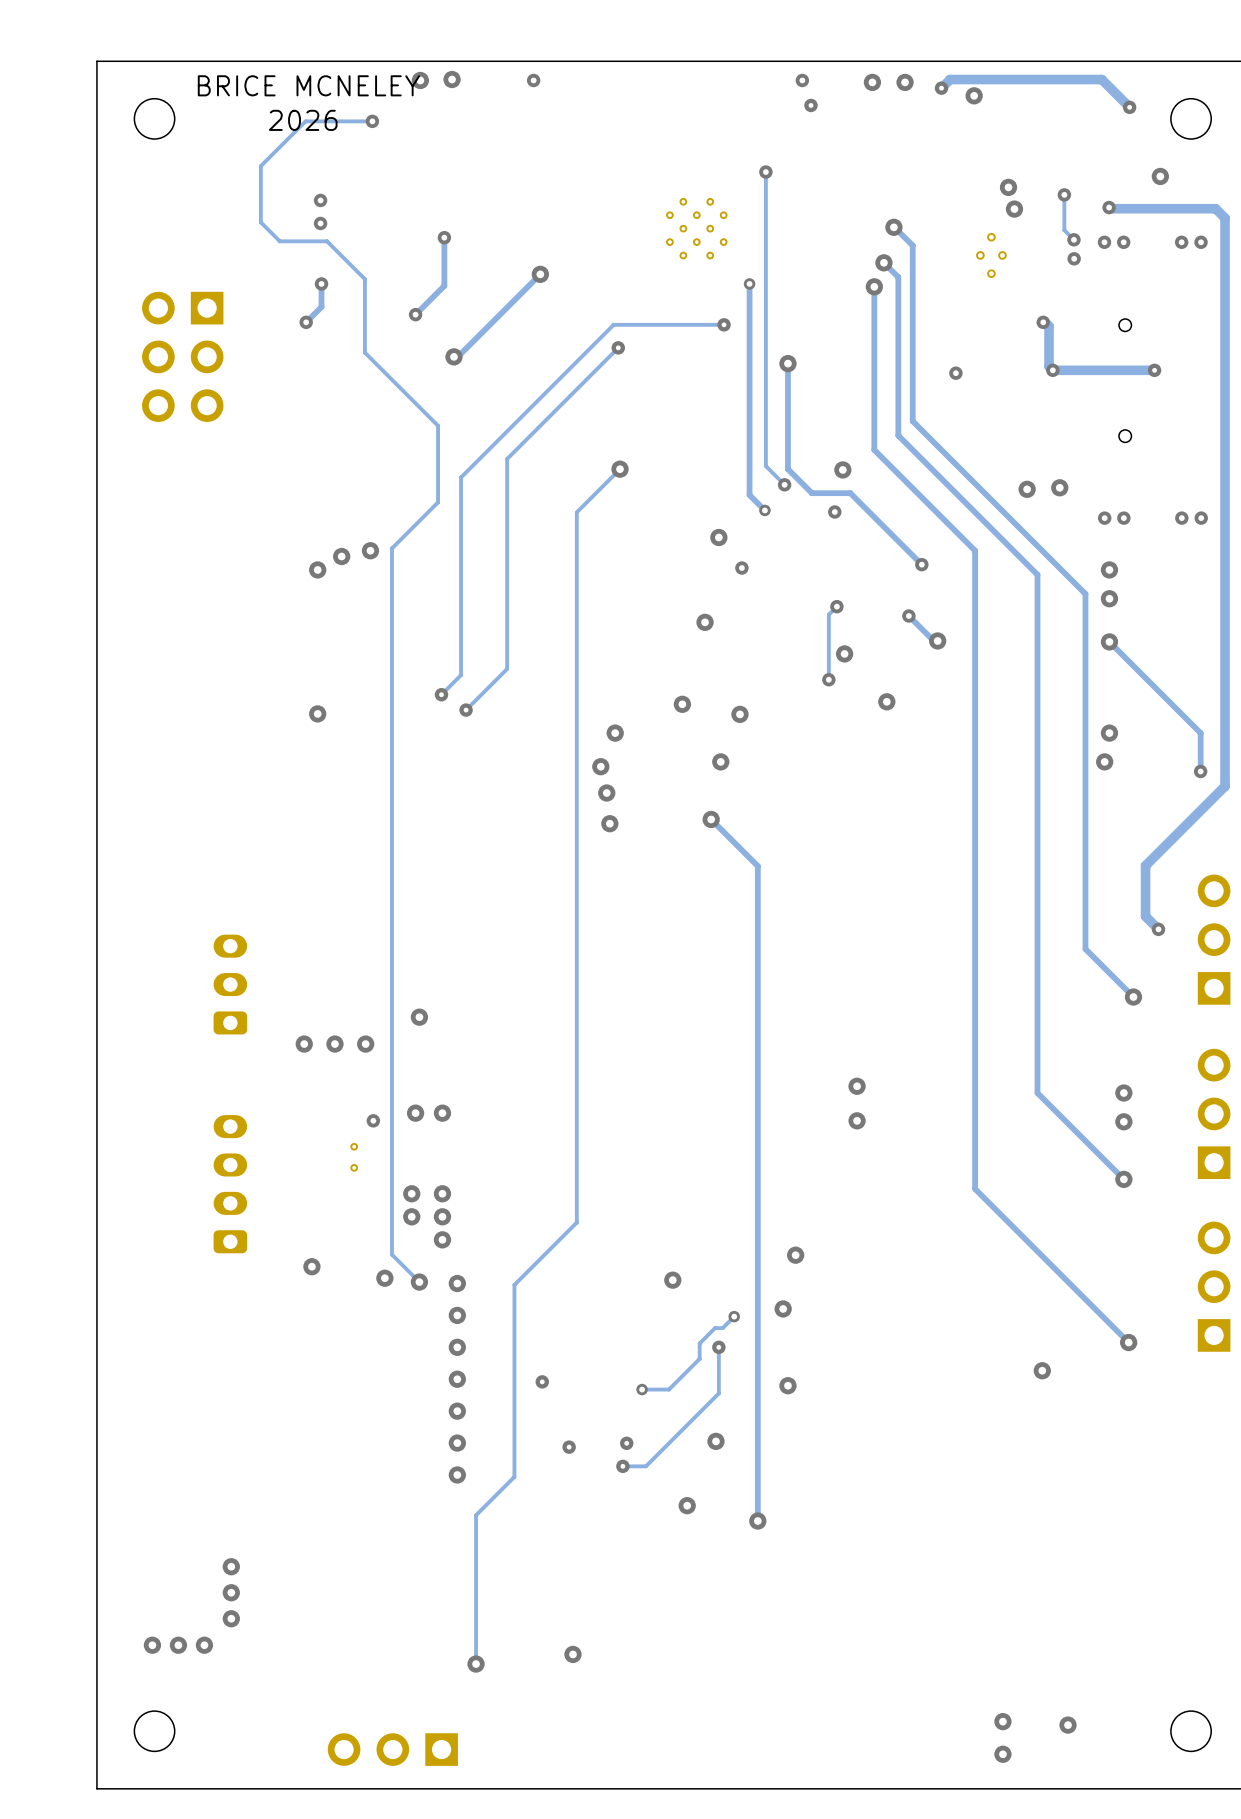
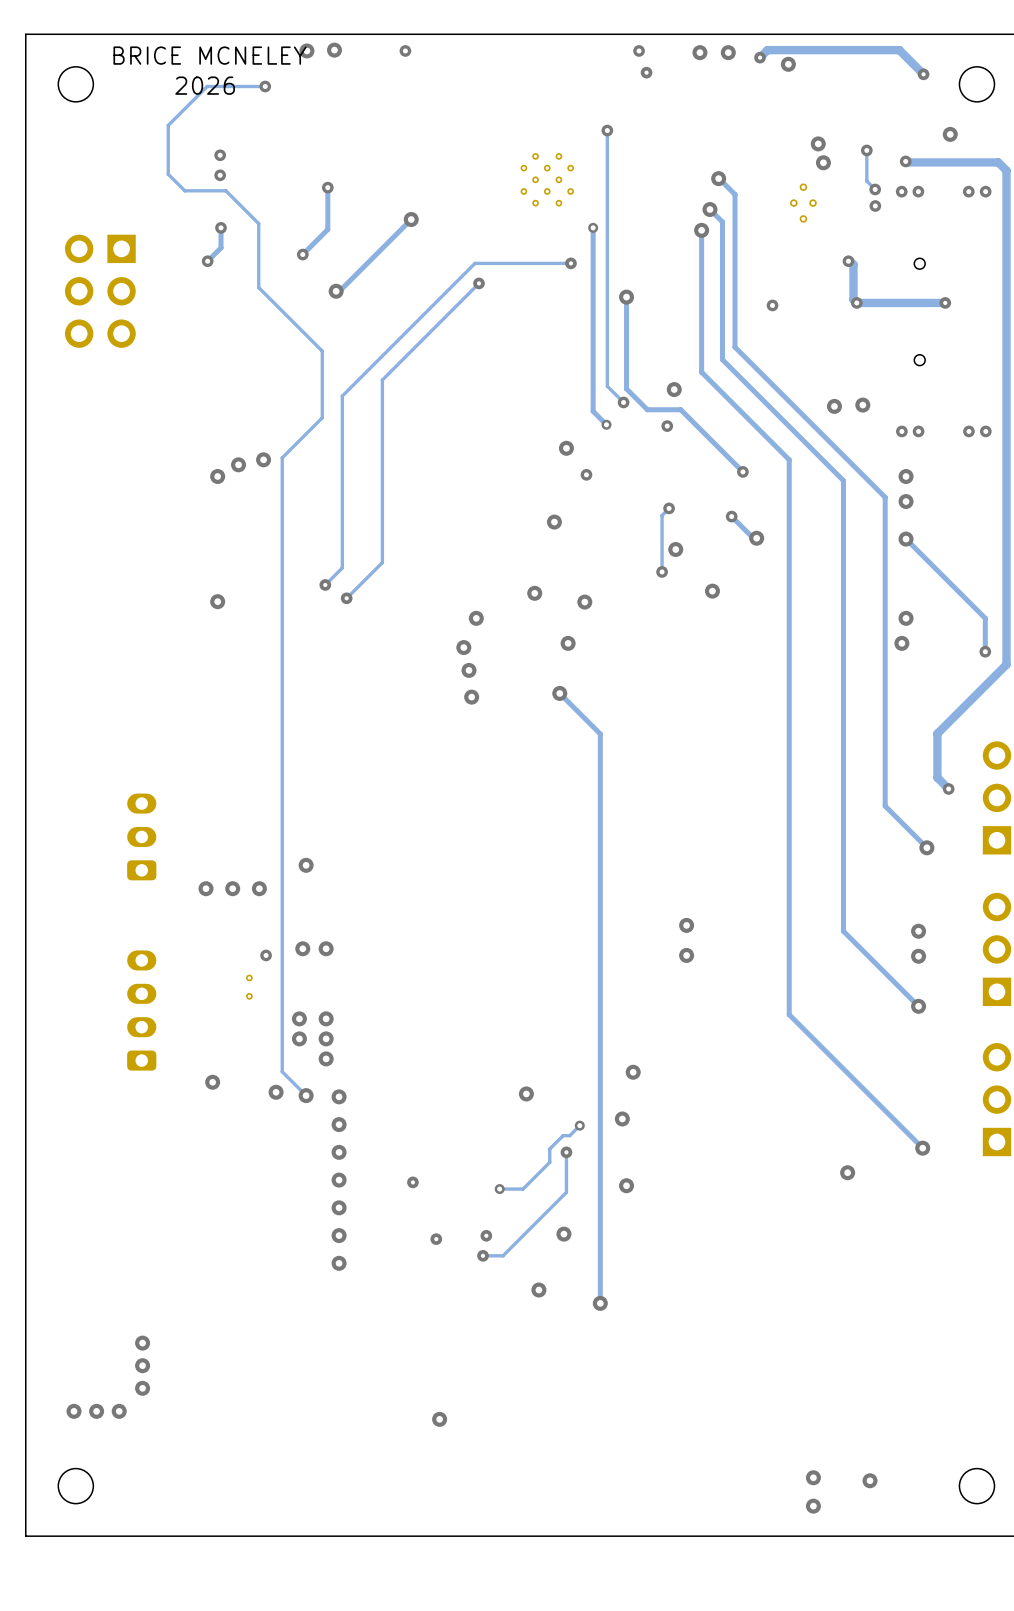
track: (620, 469) (576, 512) (576, 1222) (514, 1284) (514, 1476) (476, 1515) (476, 1664) -> none
via: (620, 469) -> none
via: (476, 1664) -> none
part: (392, 1749) -> none

